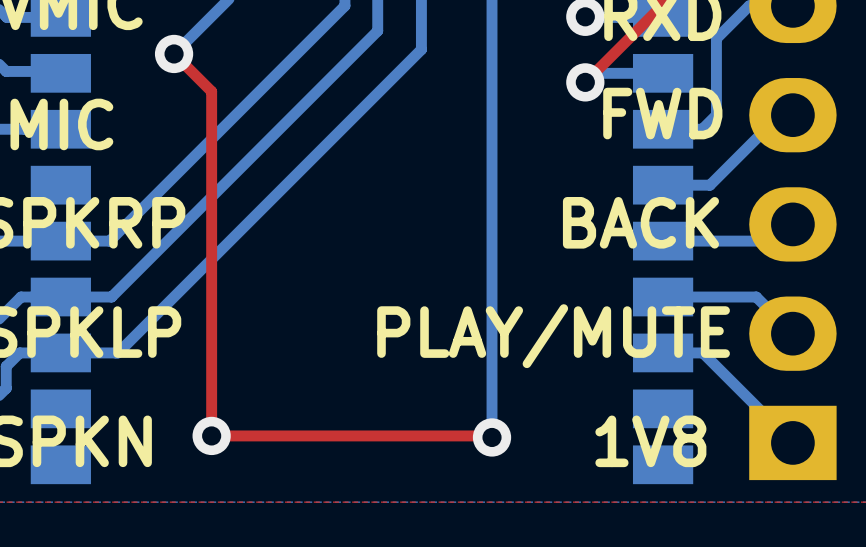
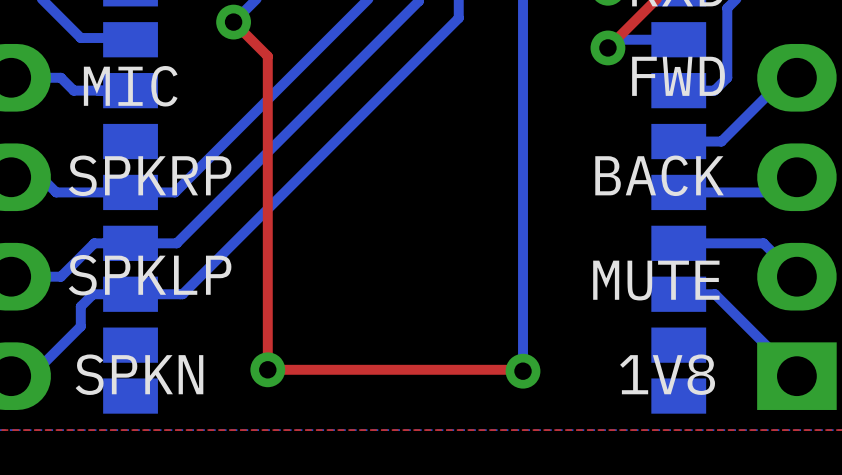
text: PLAY/MUTE (553, 336) -> MUTE (656, 280)

